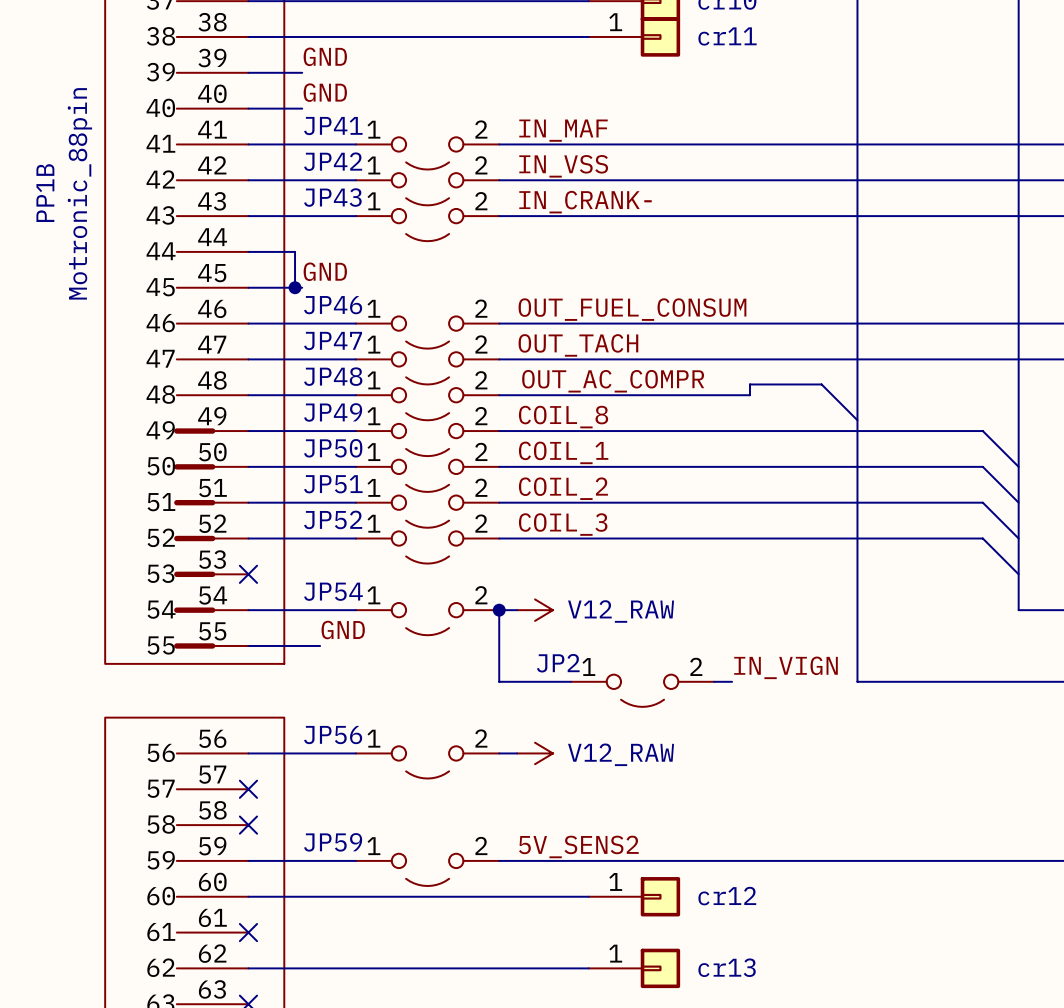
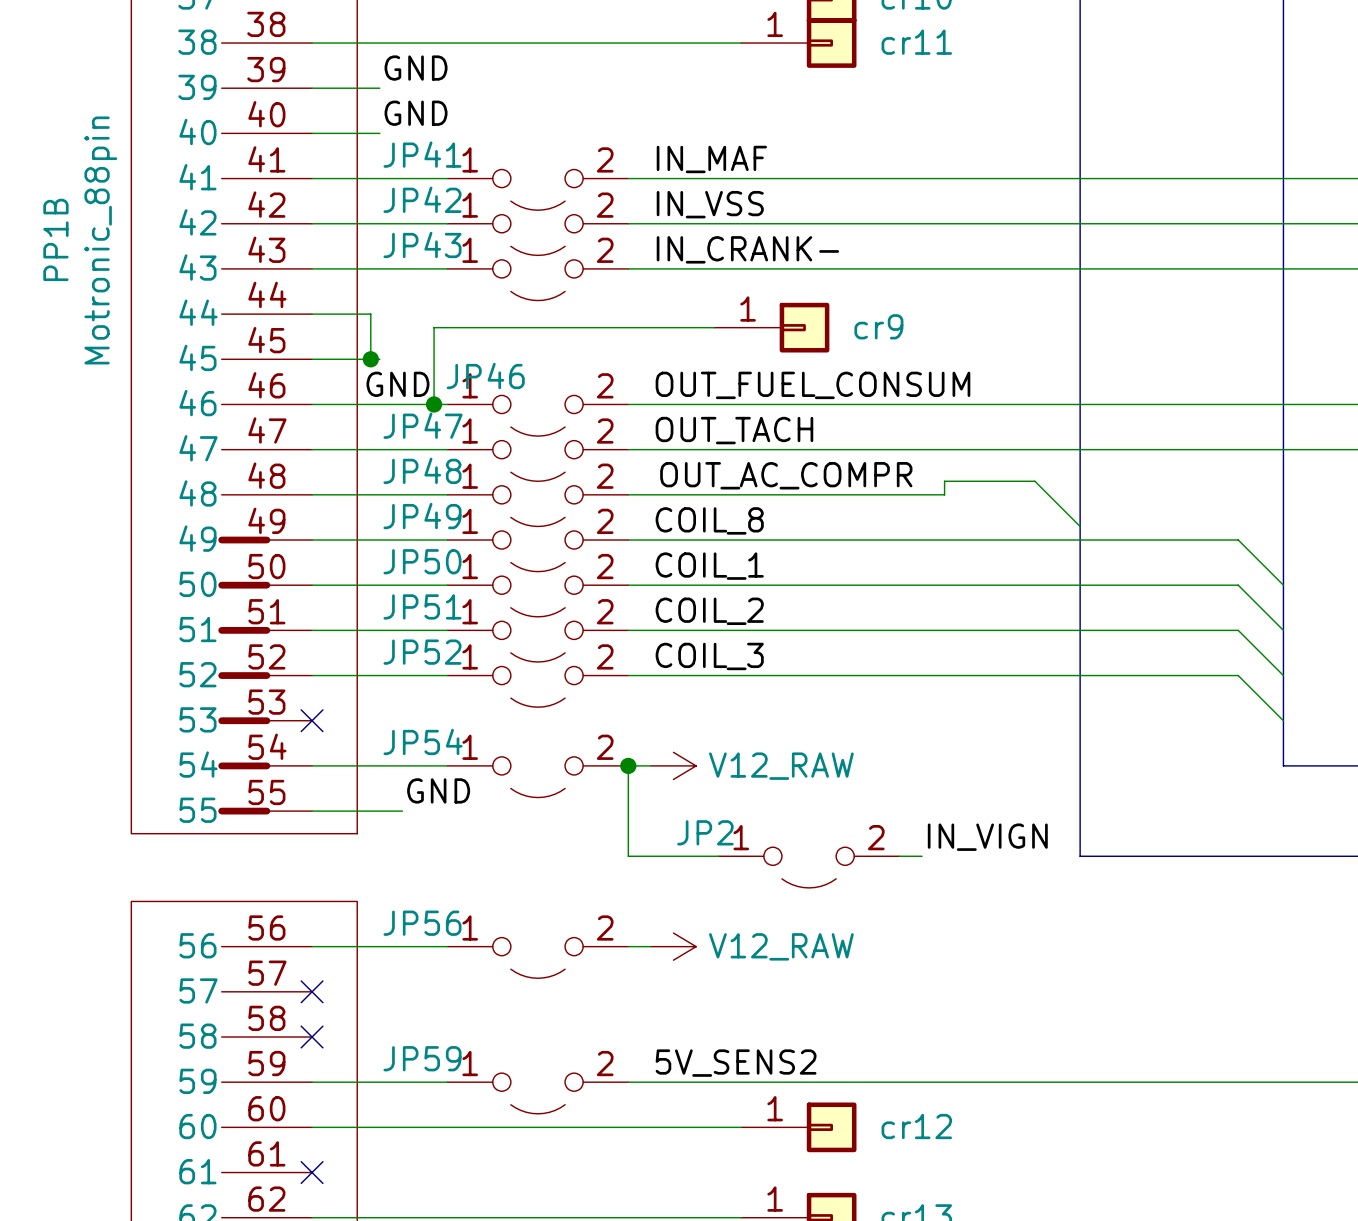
wire: none -> (714, 327) (434, 327) (434, 404)
cr9: none -> (771, 327)
label position: GND (325, 271) -> GND (397, 384)
JP46 name position: JP46 (333, 305) -> JP46 (485, 375)
junction: none -> (434, 404)

